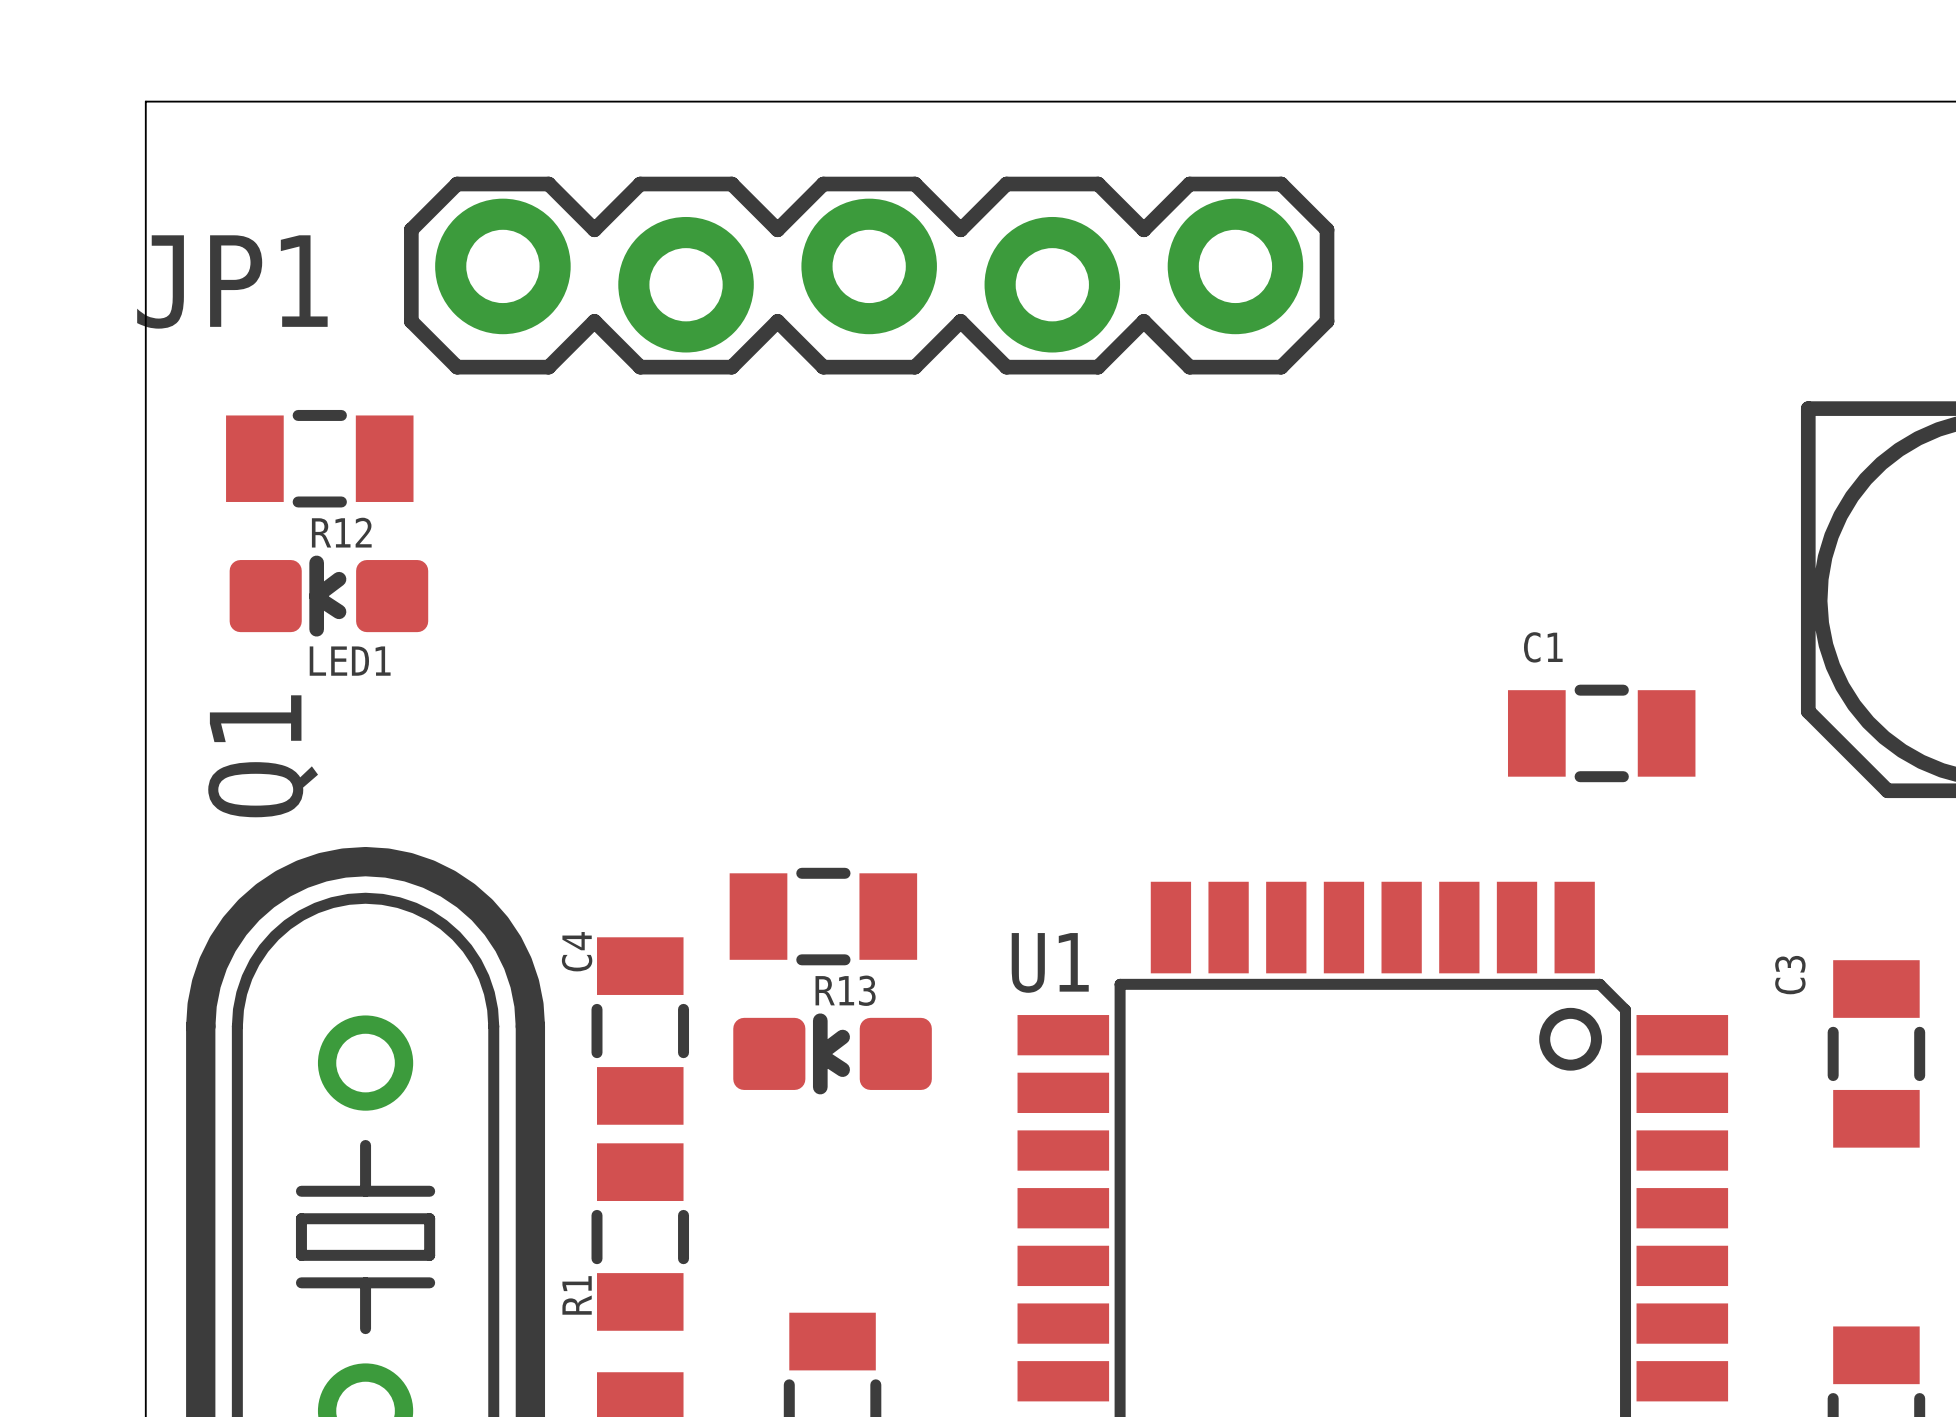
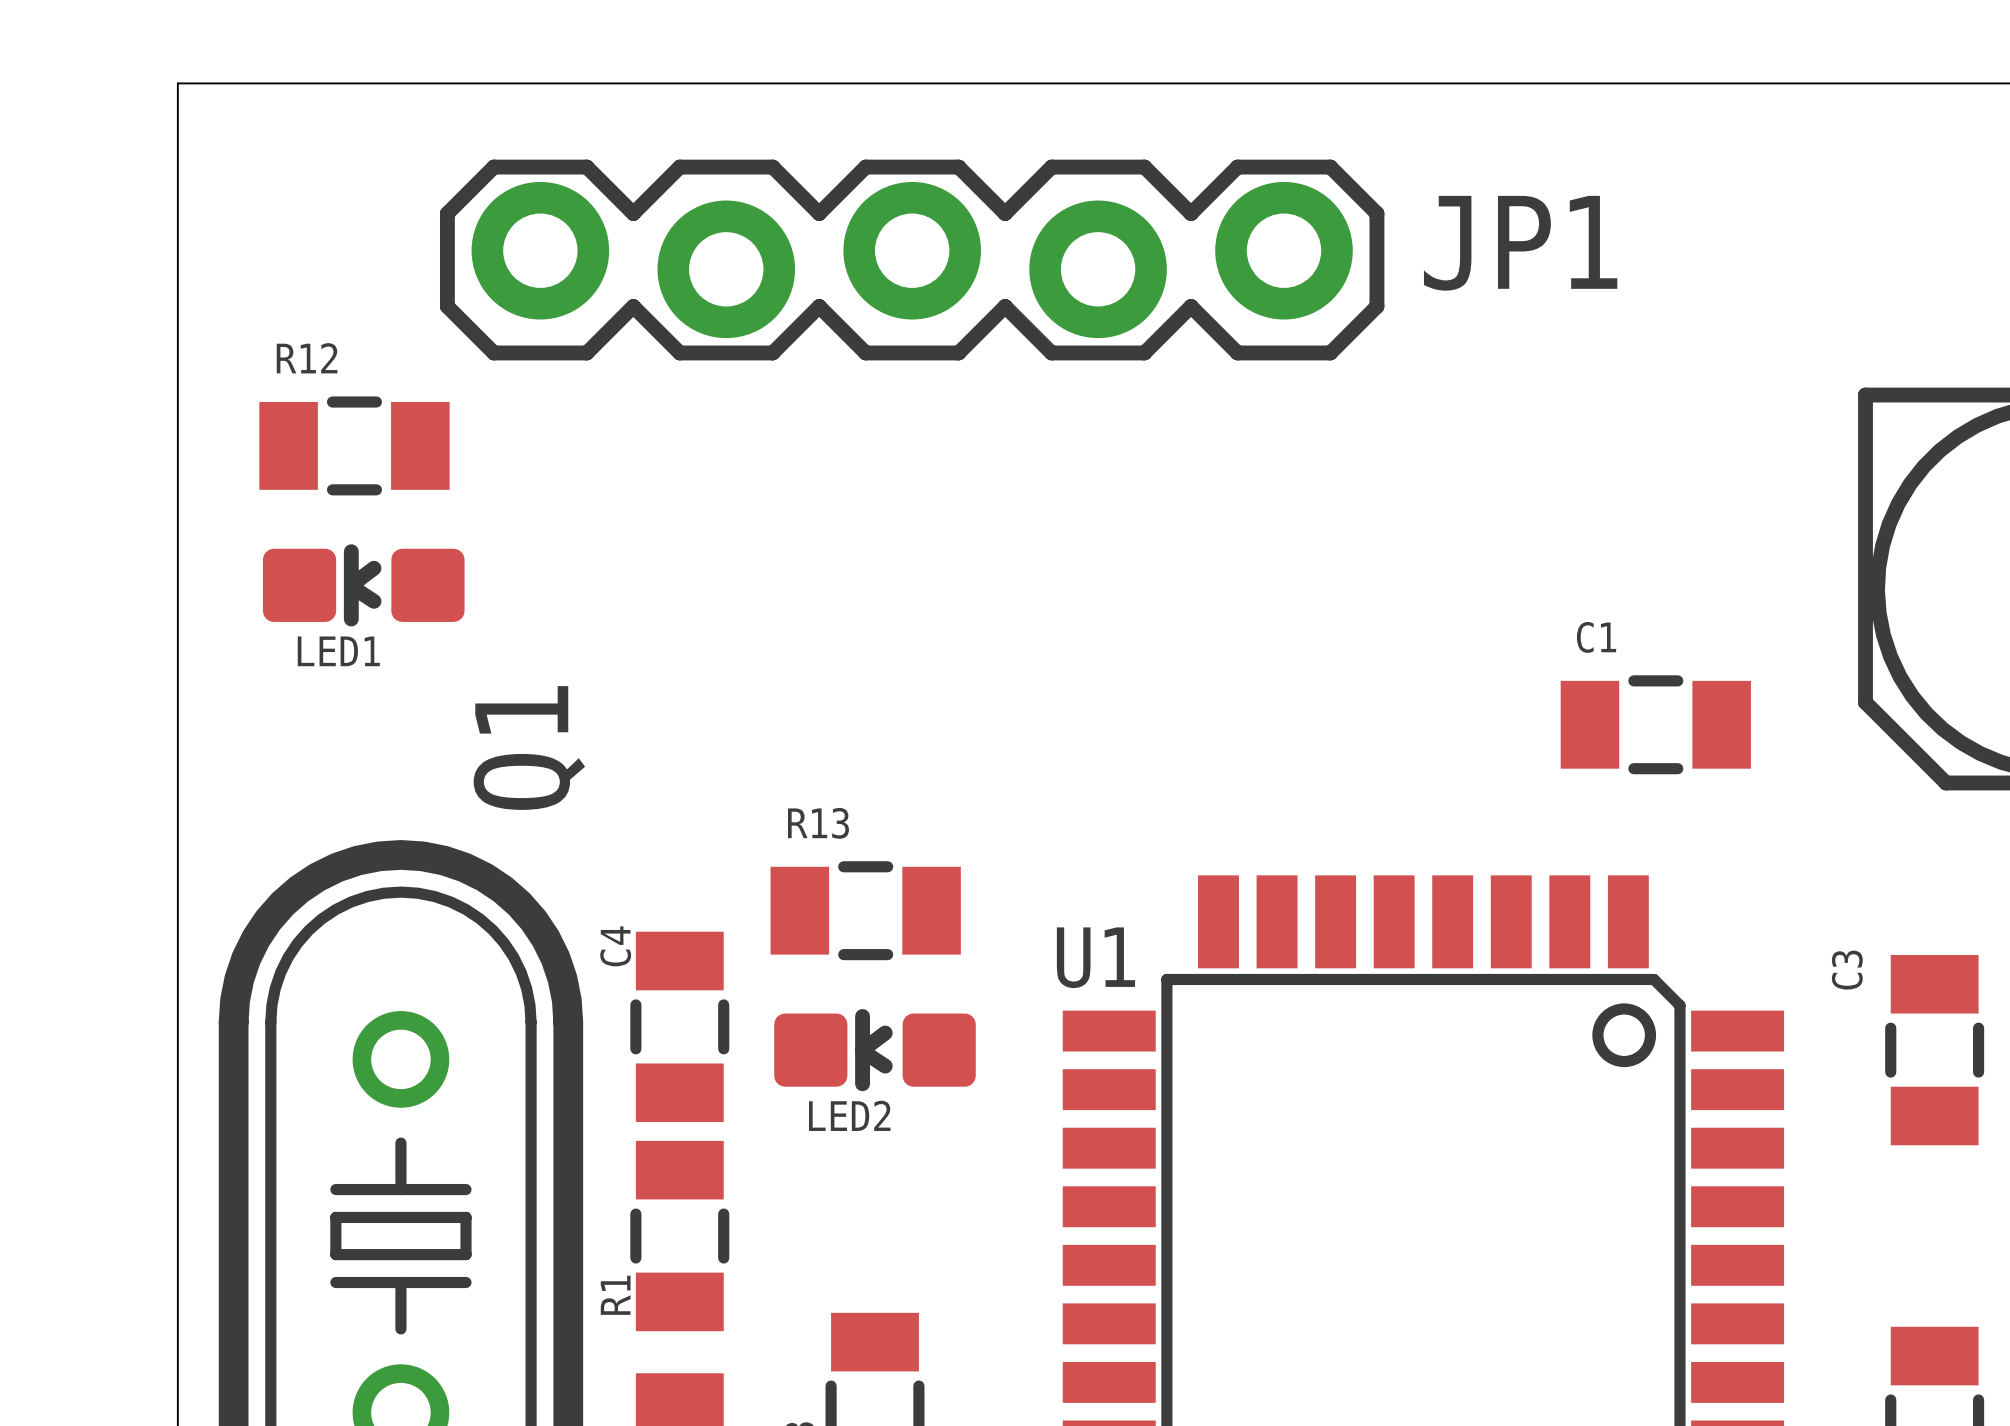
JP1 name position: JP1 (232, 281) -> JP1 (1520, 243)
R12 name position: R12 (341, 532) -> R12 (307, 358)
LED1 name position: LED1 (350, 661) -> LED1 (338, 651)
Q1 name position: Q1 (263, 756) -> Q1 (529, 748)
R13 name position: R13 (845, 990) -> R13 (818, 823)
LED2 name: none -> LED2 (849, 1115)

